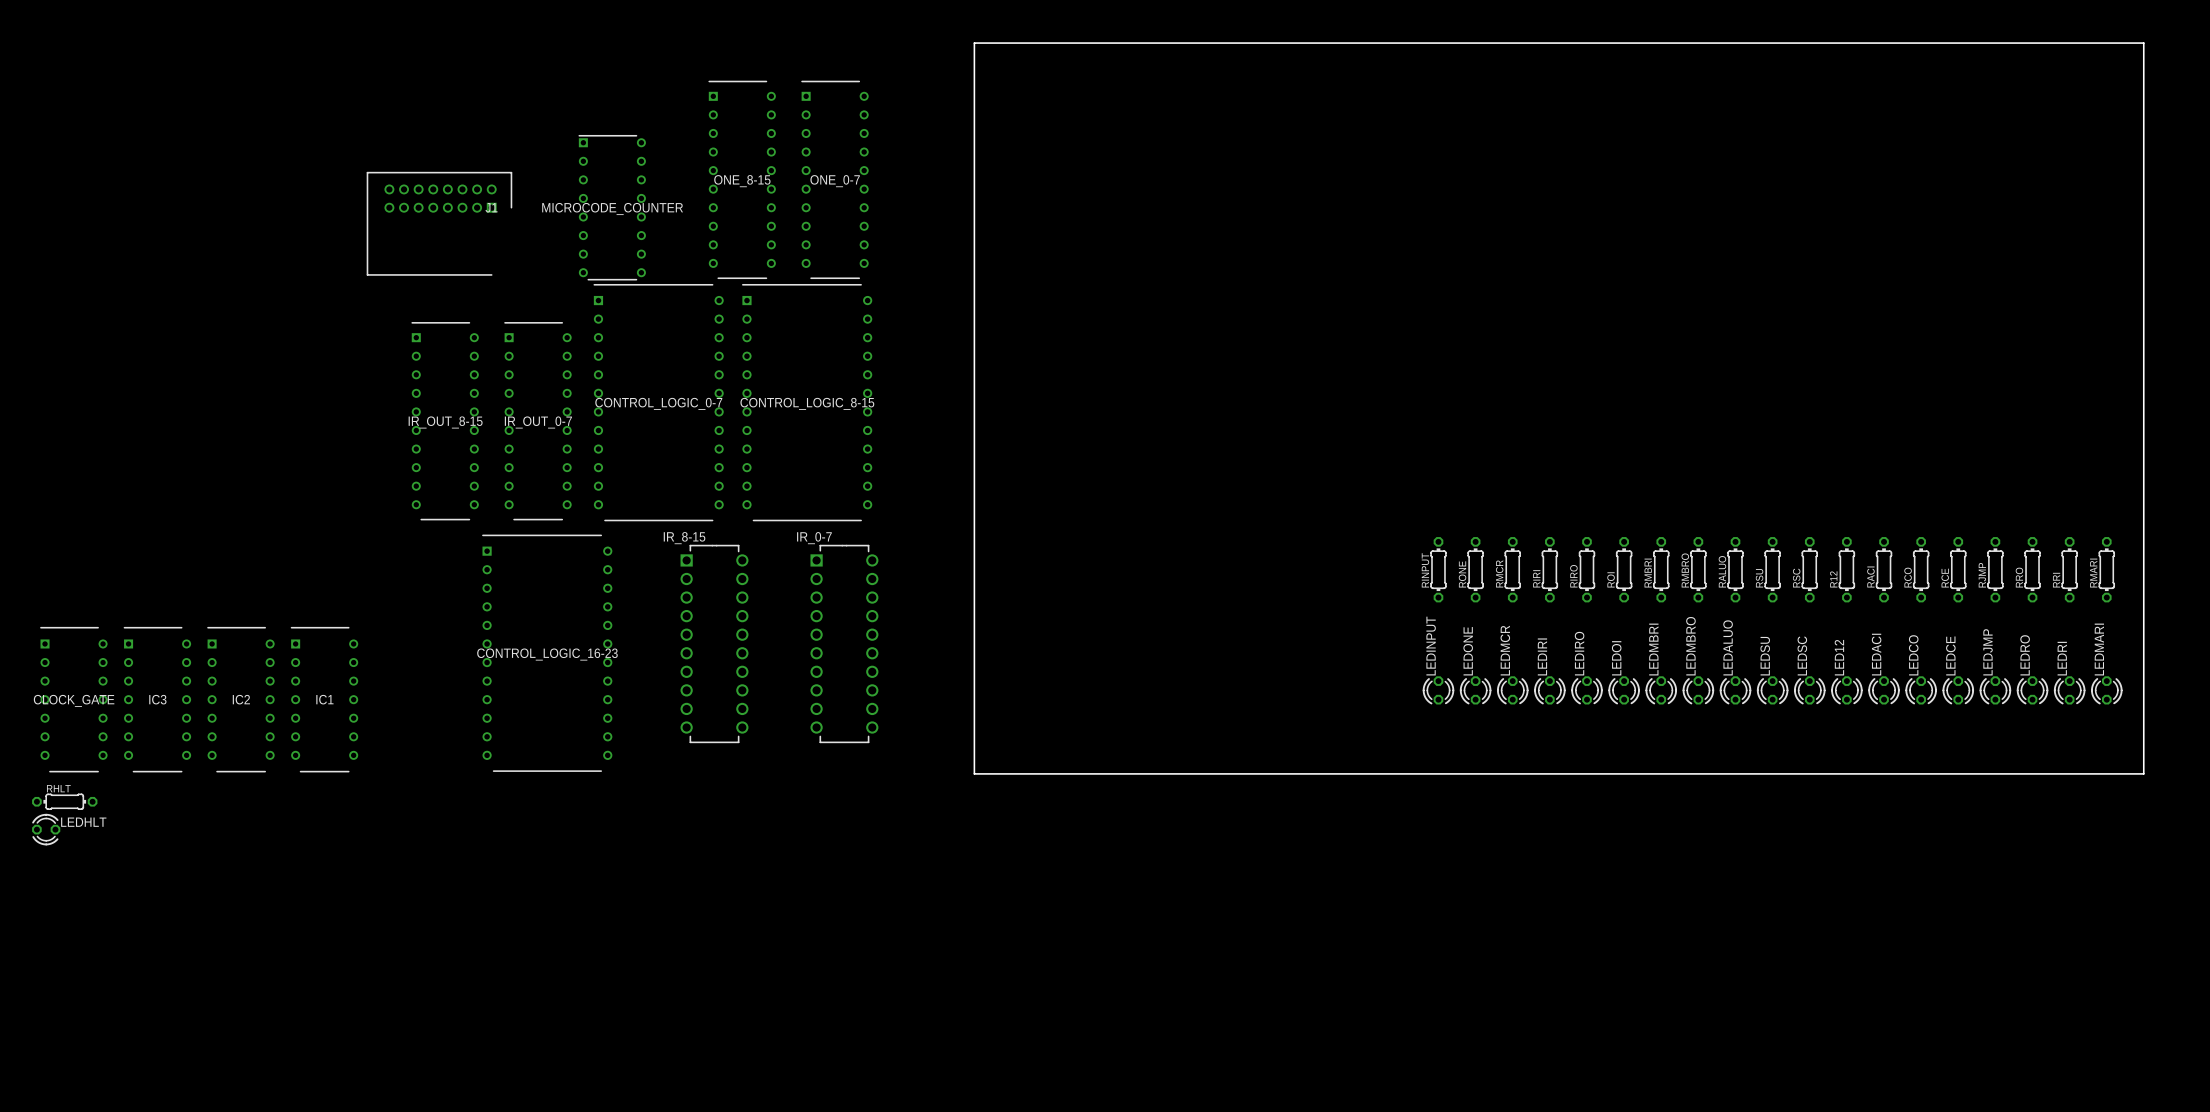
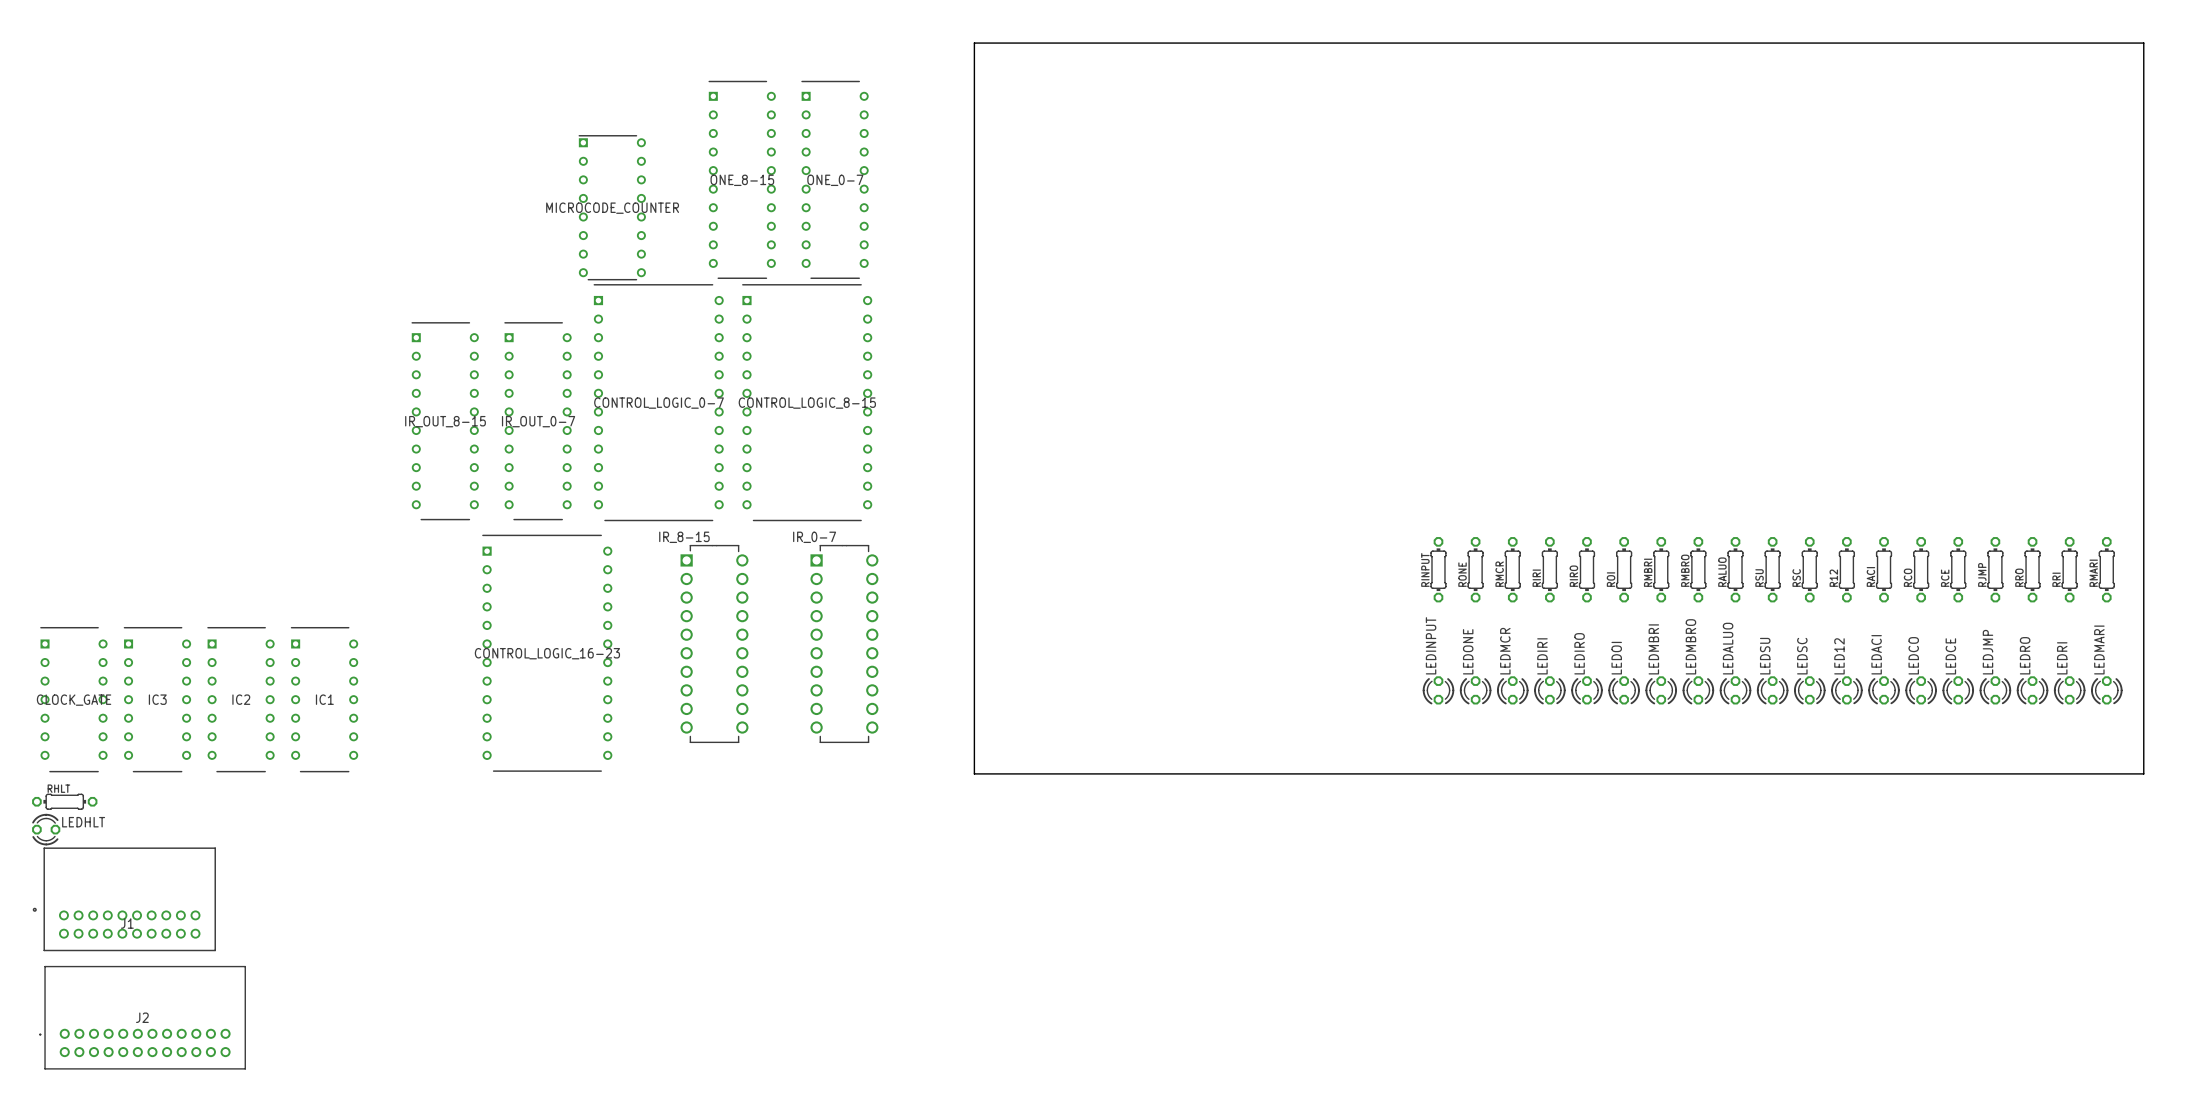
J1 footprint: [366, 171, 513, 276] -> [32, 847, 216, 952]
J1 name position: J1 (491, 207) -> J1 (127, 923)
J2: none -> (142, 1017)

